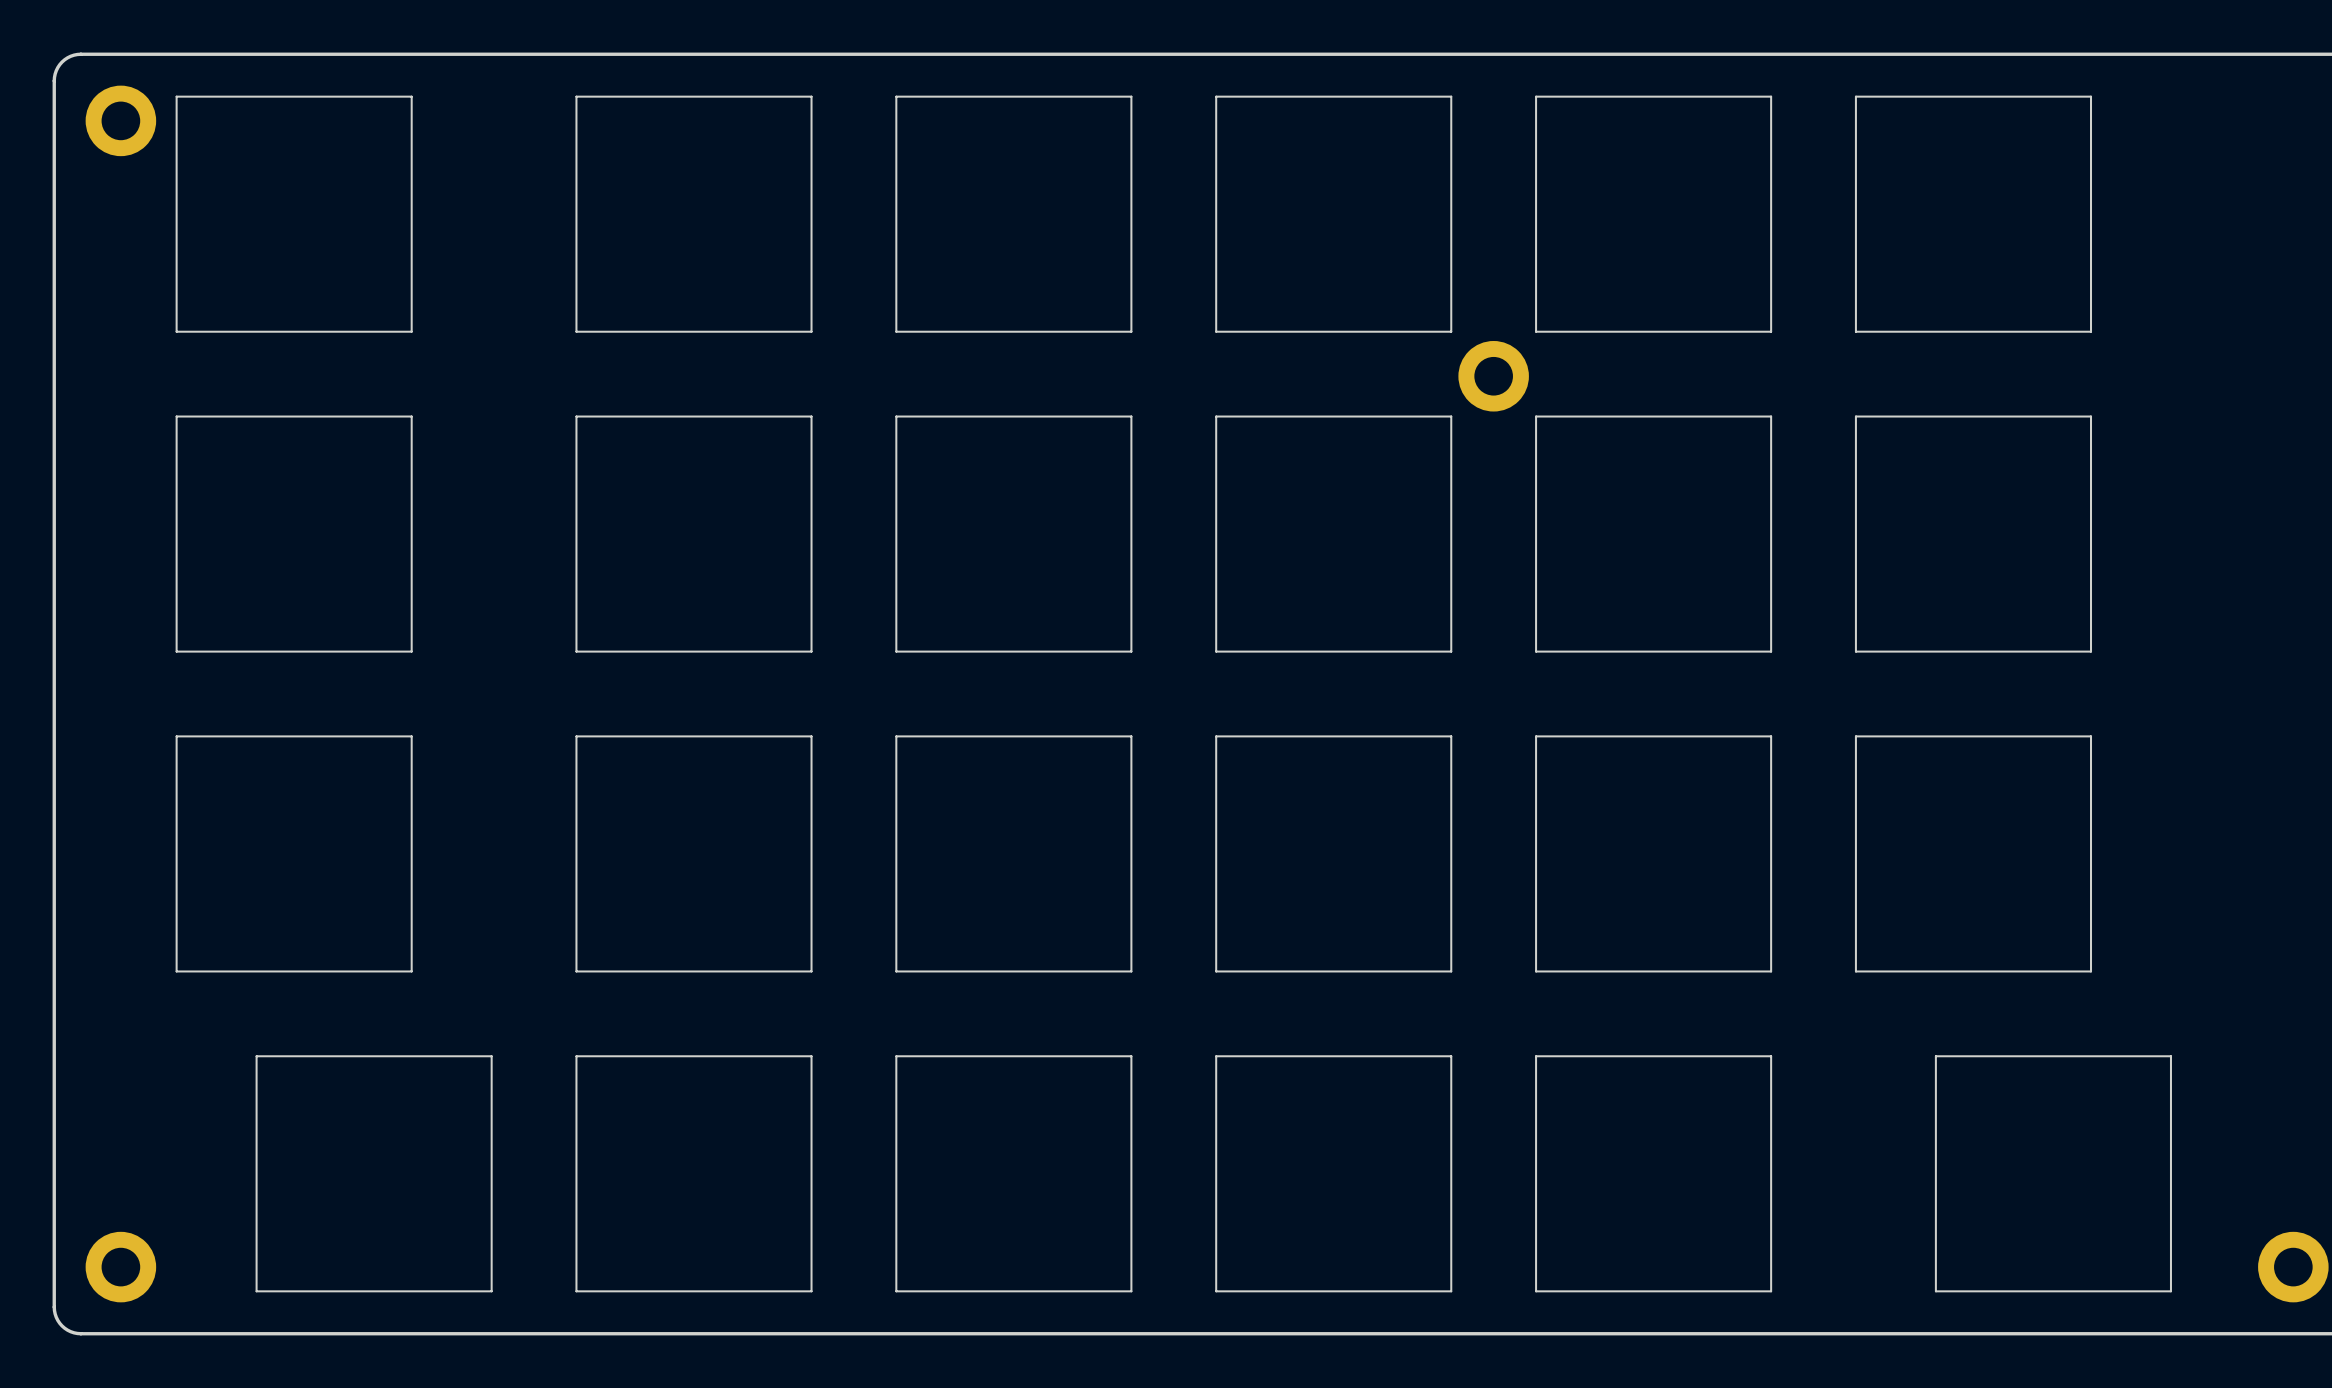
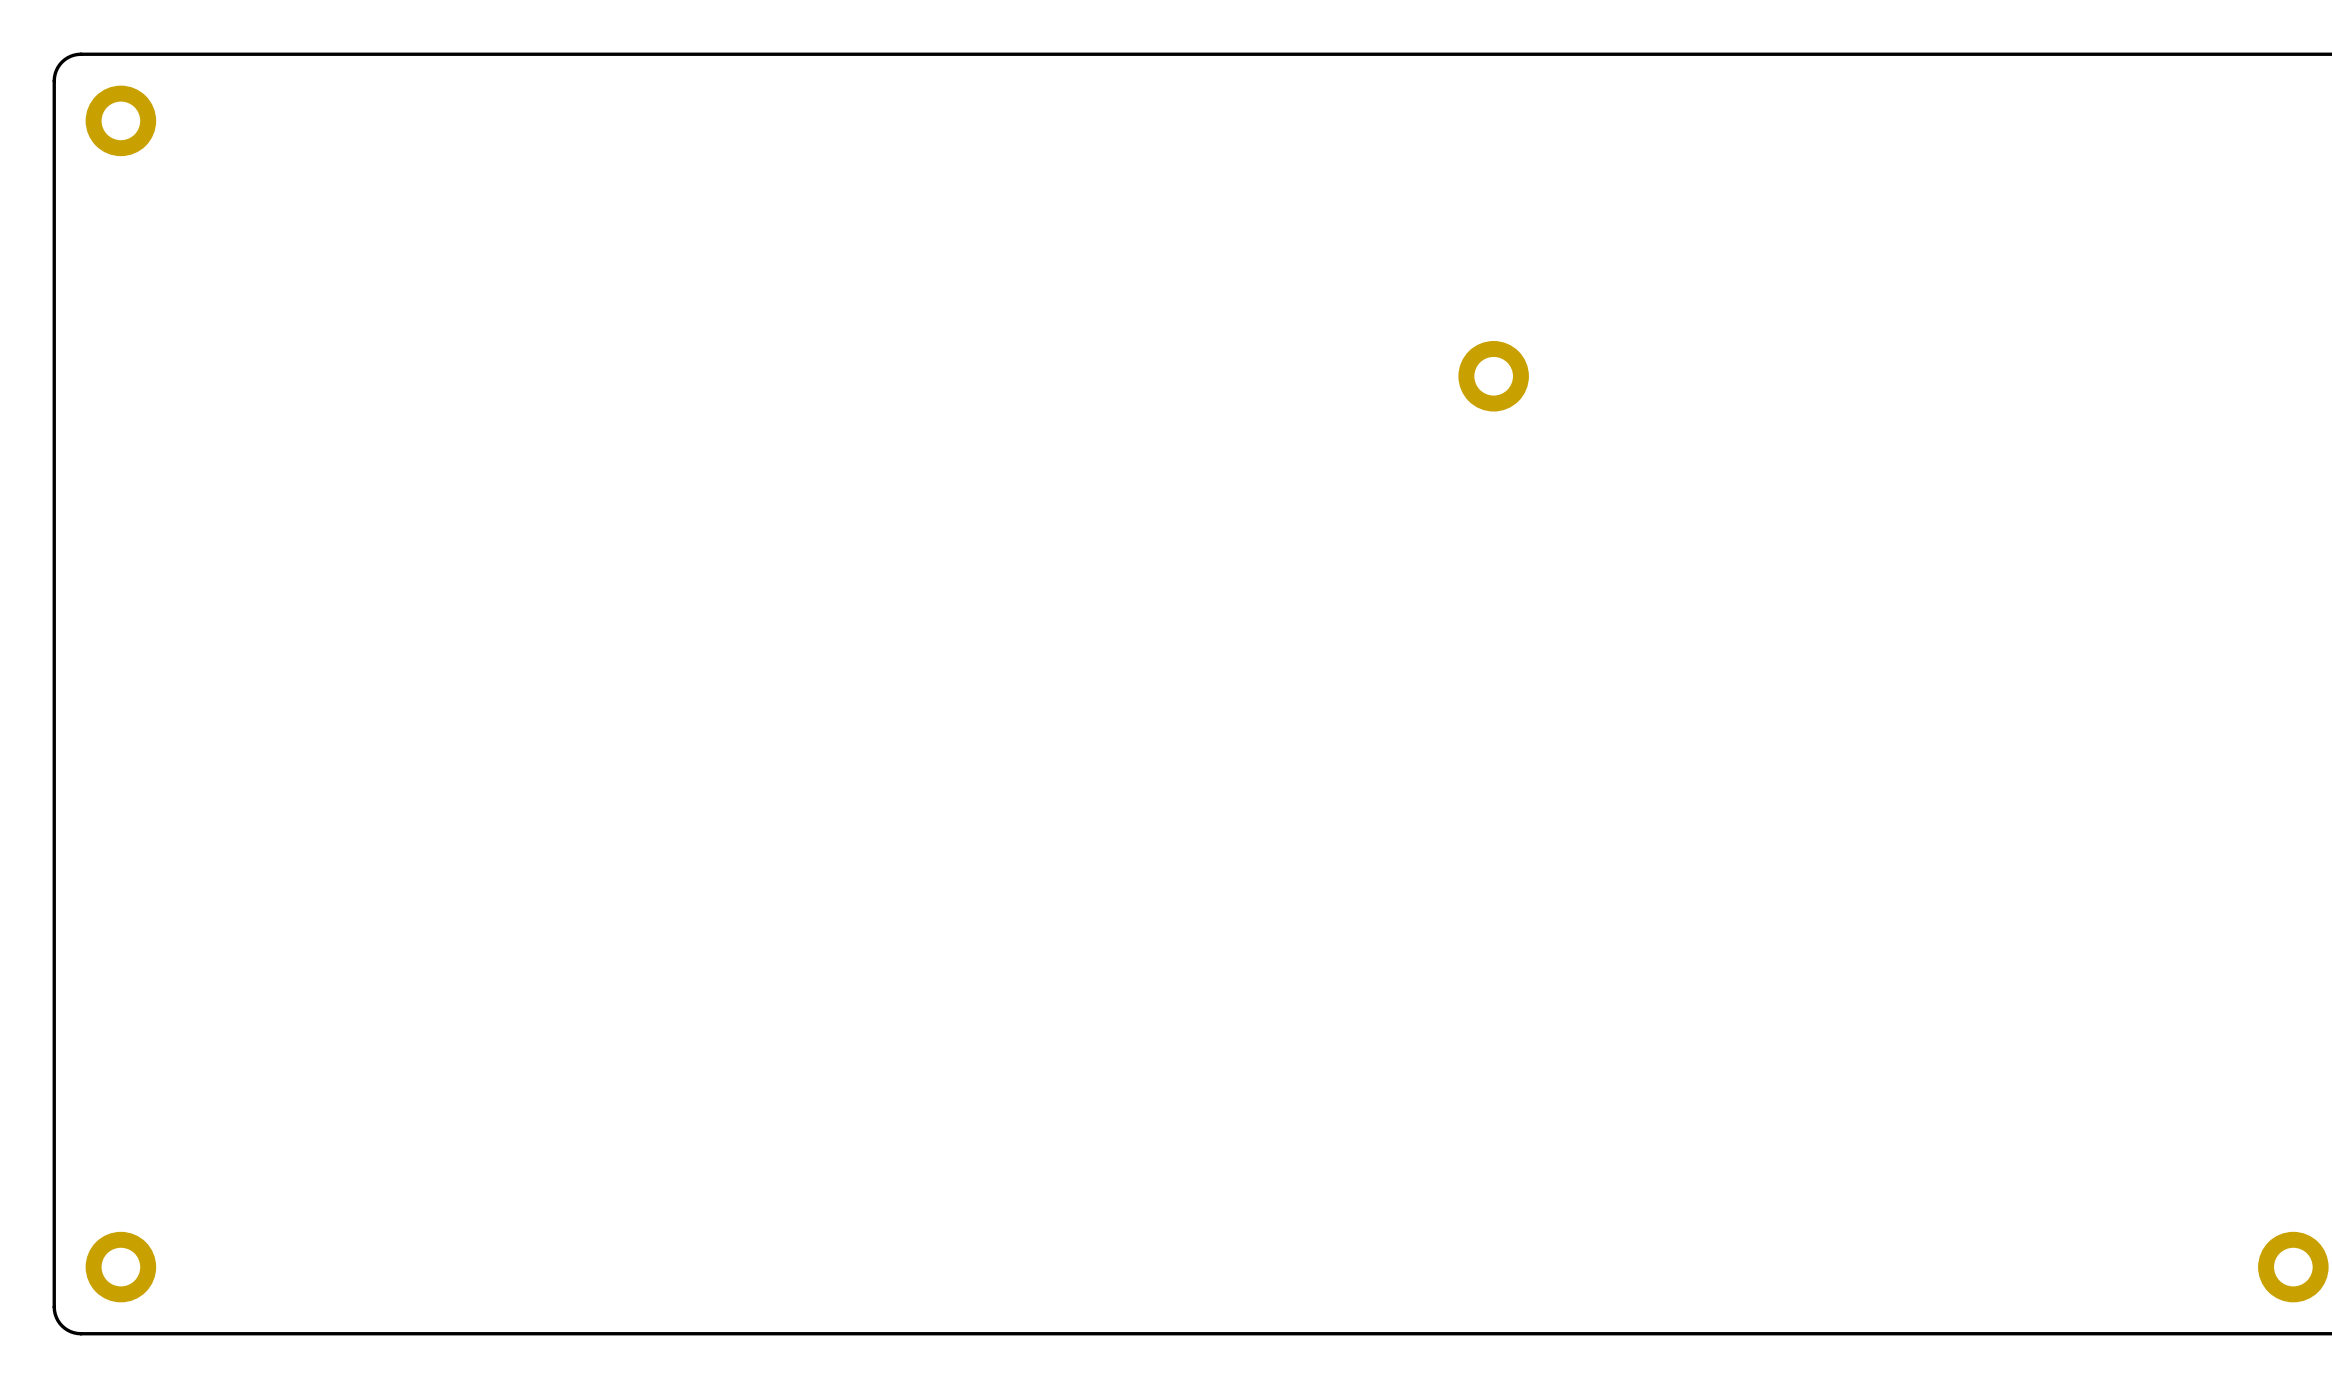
drawing: [175, 95, 413, 333] -> none
drawing: [575, 95, 813, 333] -> none
drawing: [895, 95, 1133, 333] -> none
drawing: [1215, 95, 1453, 333] -> none
drawing: [1535, 95, 1773, 333] -> none
drawing: [1854, 95, 2093, 333] -> none
drawing: [175, 415, 413, 653] -> none
drawing: [575, 415, 813, 653] -> none
drawing: [895, 415, 1133, 653] -> none
drawing: [1215, 415, 1453, 653] -> none
drawing: [1535, 415, 1773, 653] -> none
drawing: [1854, 415, 2093, 653] -> none
drawing: [175, 735, 413, 973] -> none
drawing: [575, 735, 813, 973] -> none
drawing: [895, 735, 1133, 973] -> none
drawing: [1215, 735, 1453, 973] -> none
drawing: [1535, 735, 1773, 973] -> none
drawing: [1854, 735, 2093, 973] -> none
drawing: [255, 1055, 493, 1293] -> none
drawing: [575, 1055, 813, 1293] -> none
drawing: [895, 1055, 1133, 1293] -> none
drawing: [1215, 1055, 1453, 1293] -> none
drawing: [1535, 1055, 1773, 1293] -> none
drawing: [1934, 1055, 2172, 1293] -> none

